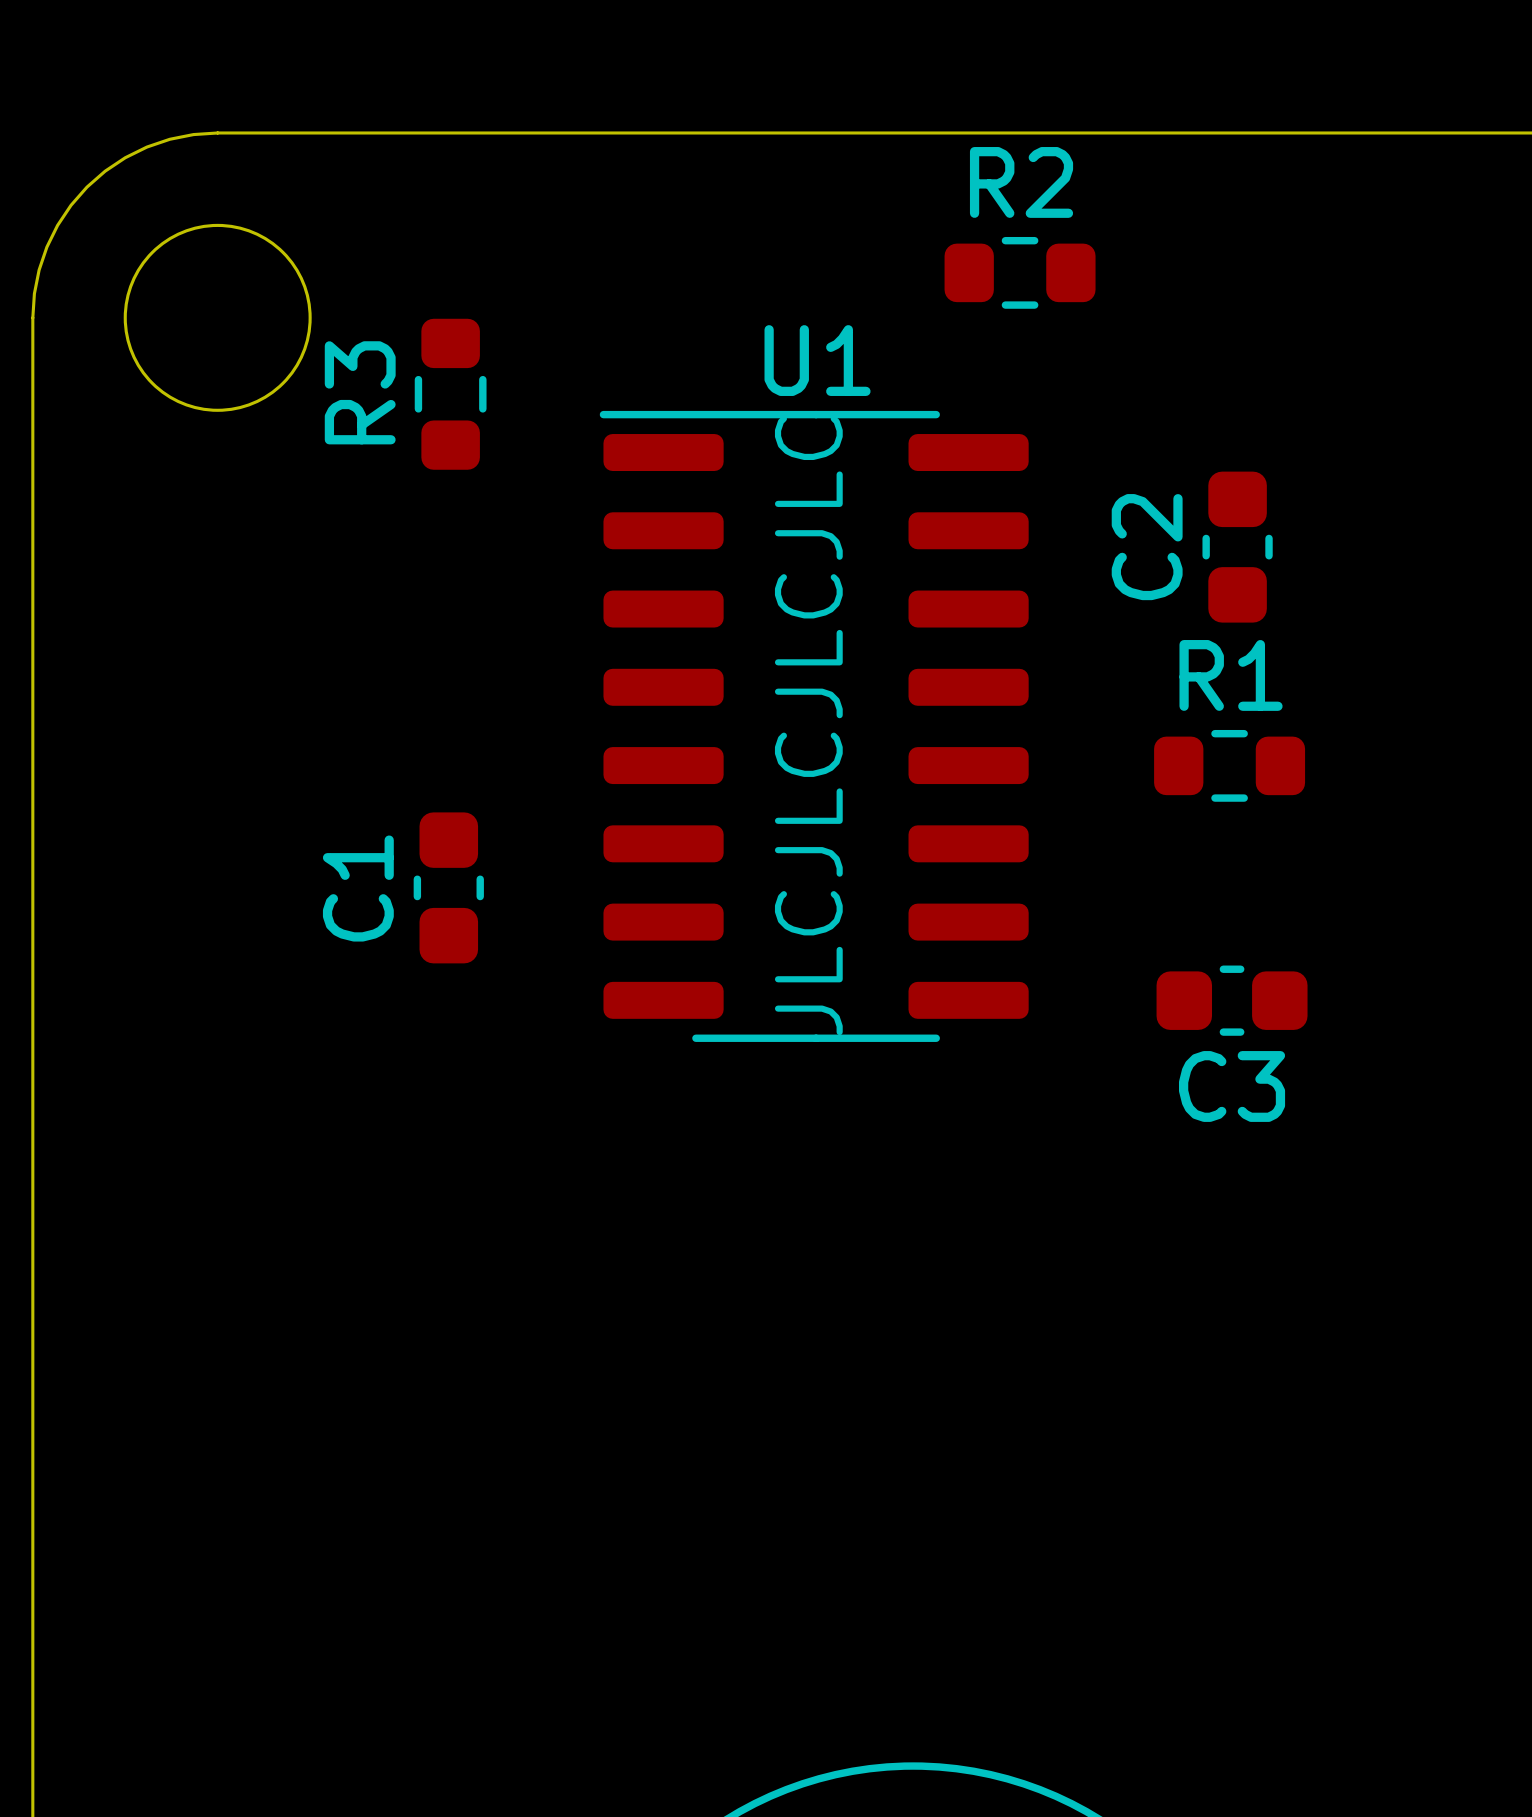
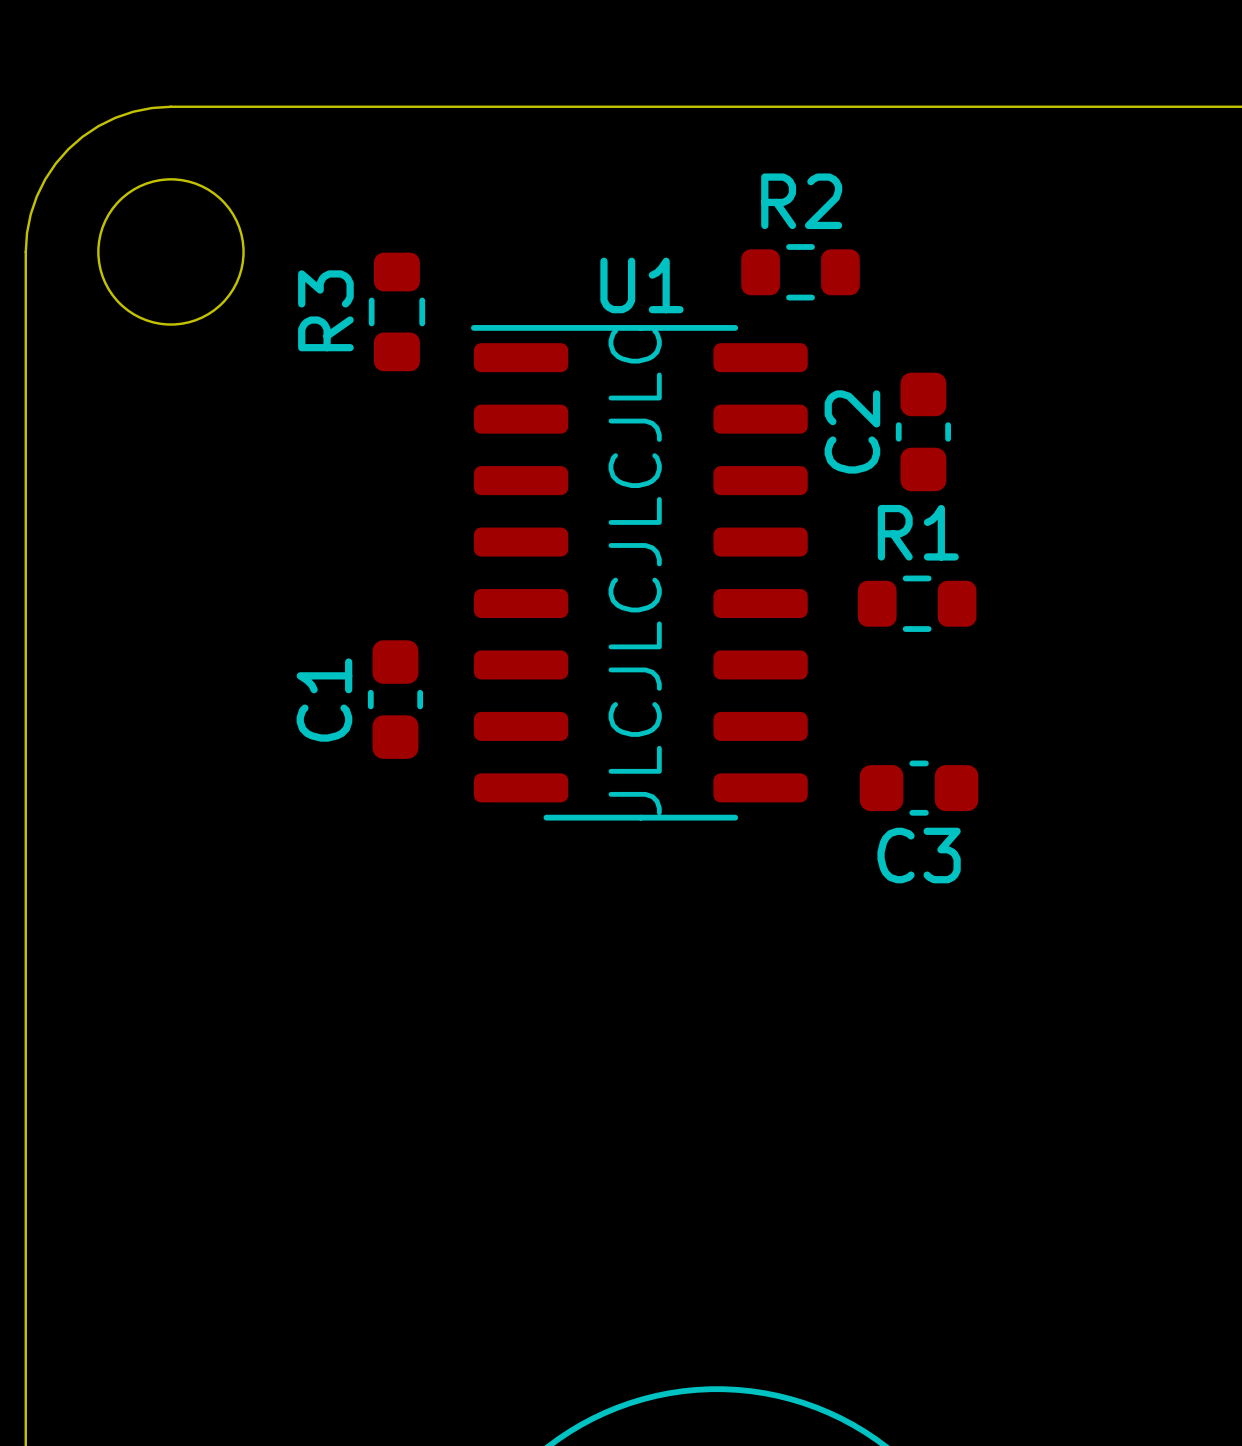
R2 position: (1020, 272) -> (800, 272)
R3 position: (450, 394) -> (396, 311)
C2 position: (1237, 547) -> (923, 431)
R1 position: (1229, 765) -> (917, 603)
C1 position: (448, 887) -> (395, 699)
C3 position: (1232, 1000) -> (919, 788)

